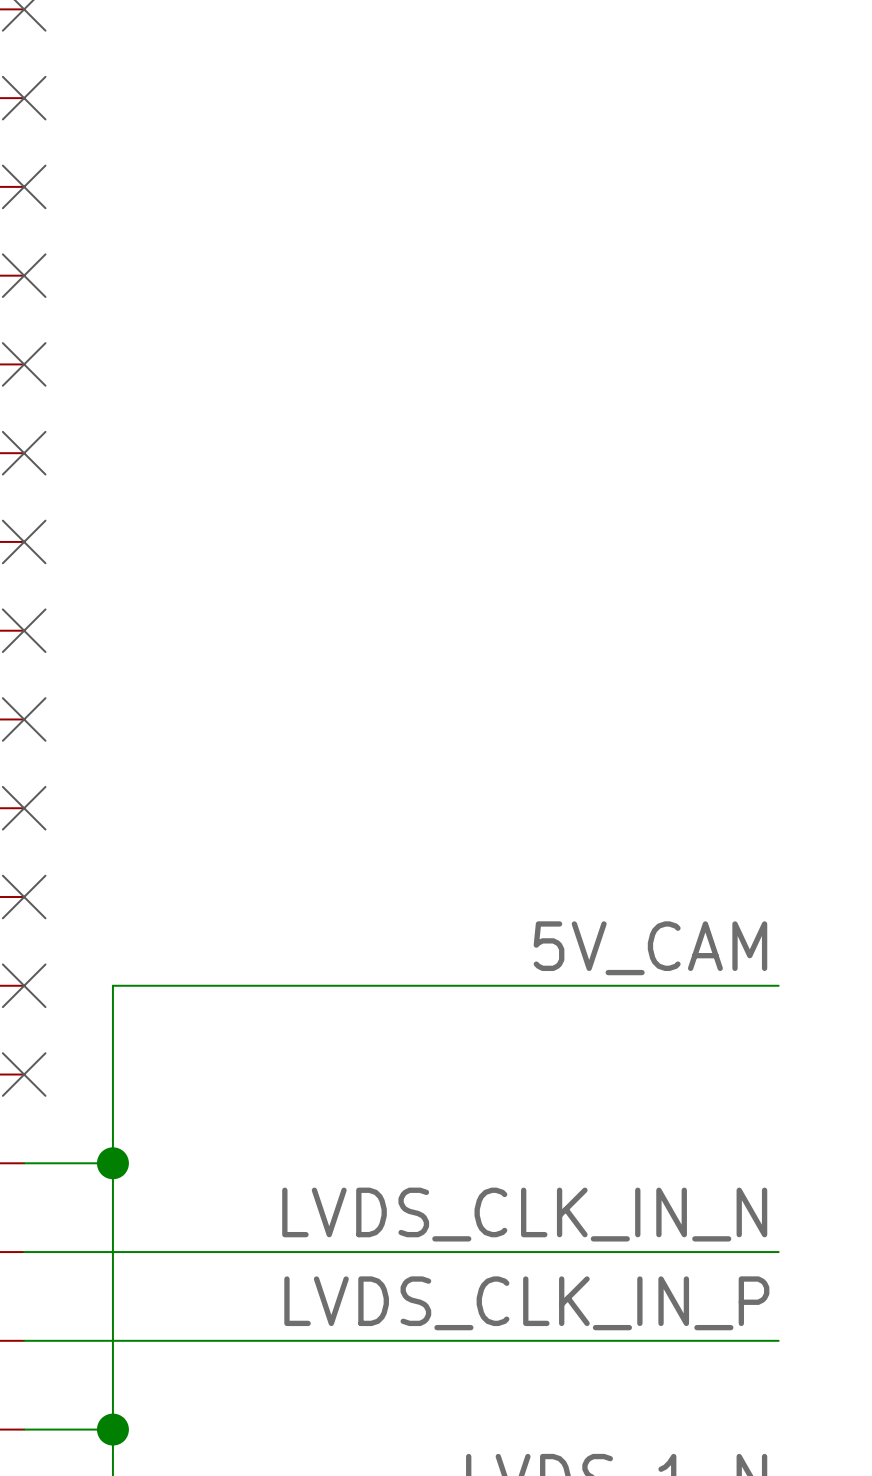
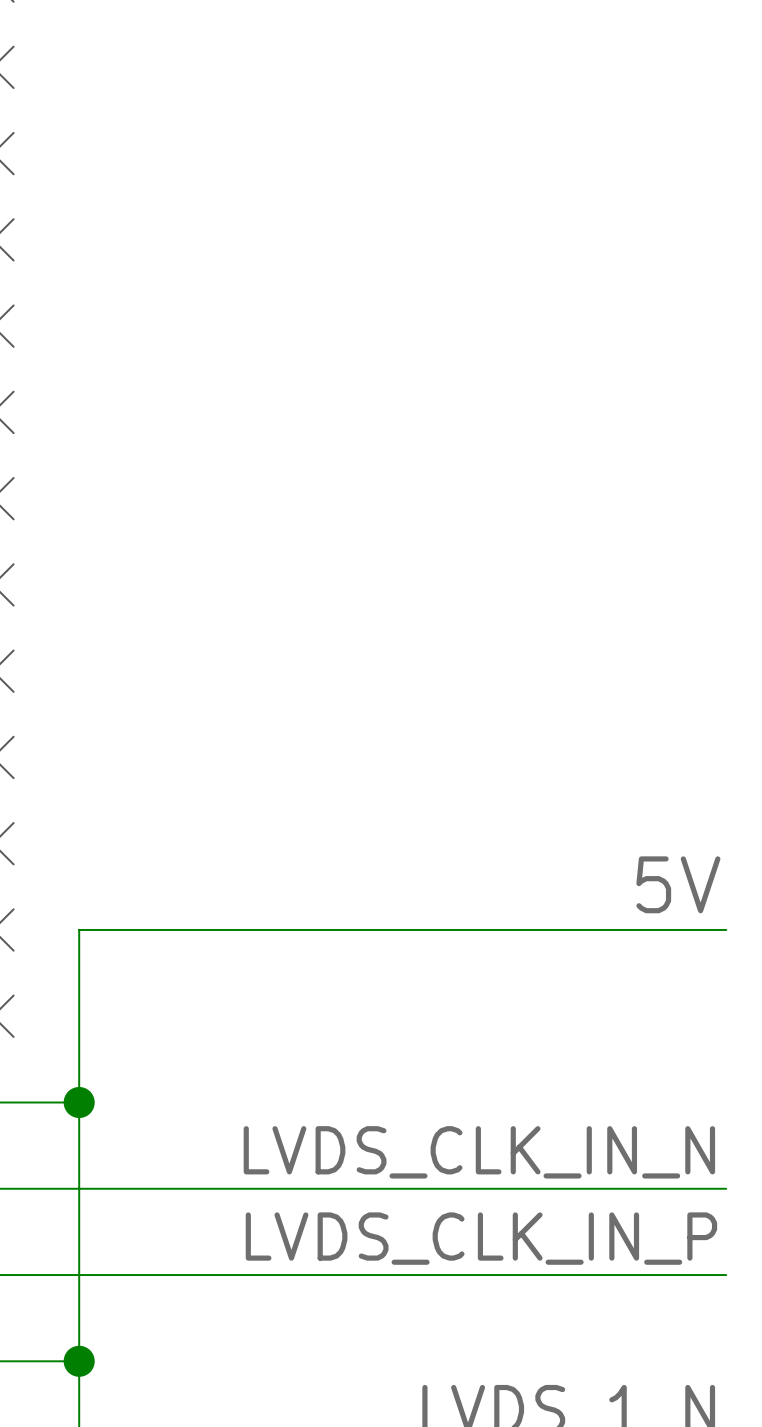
label: 5V_CAM (650, 948) -> 5V (678, 884)

